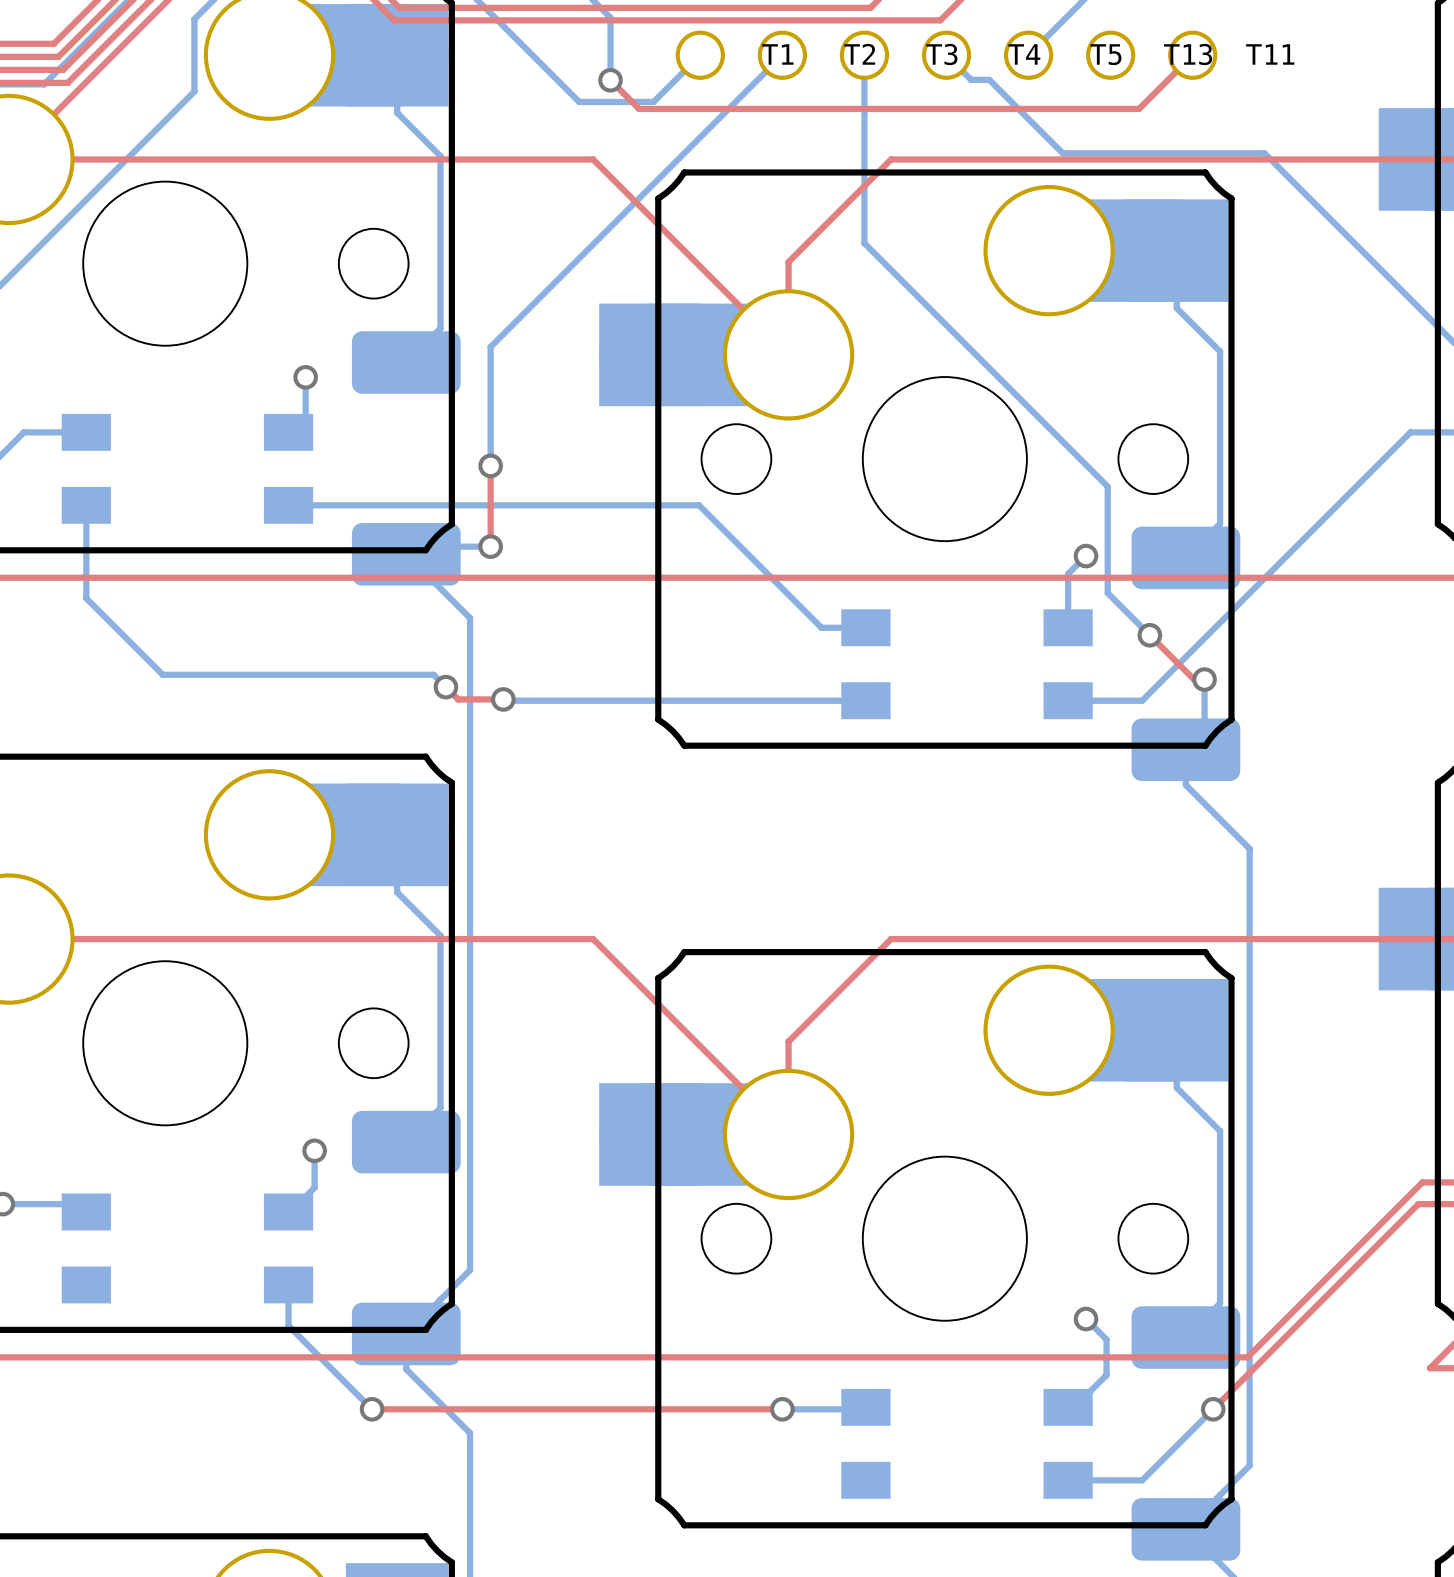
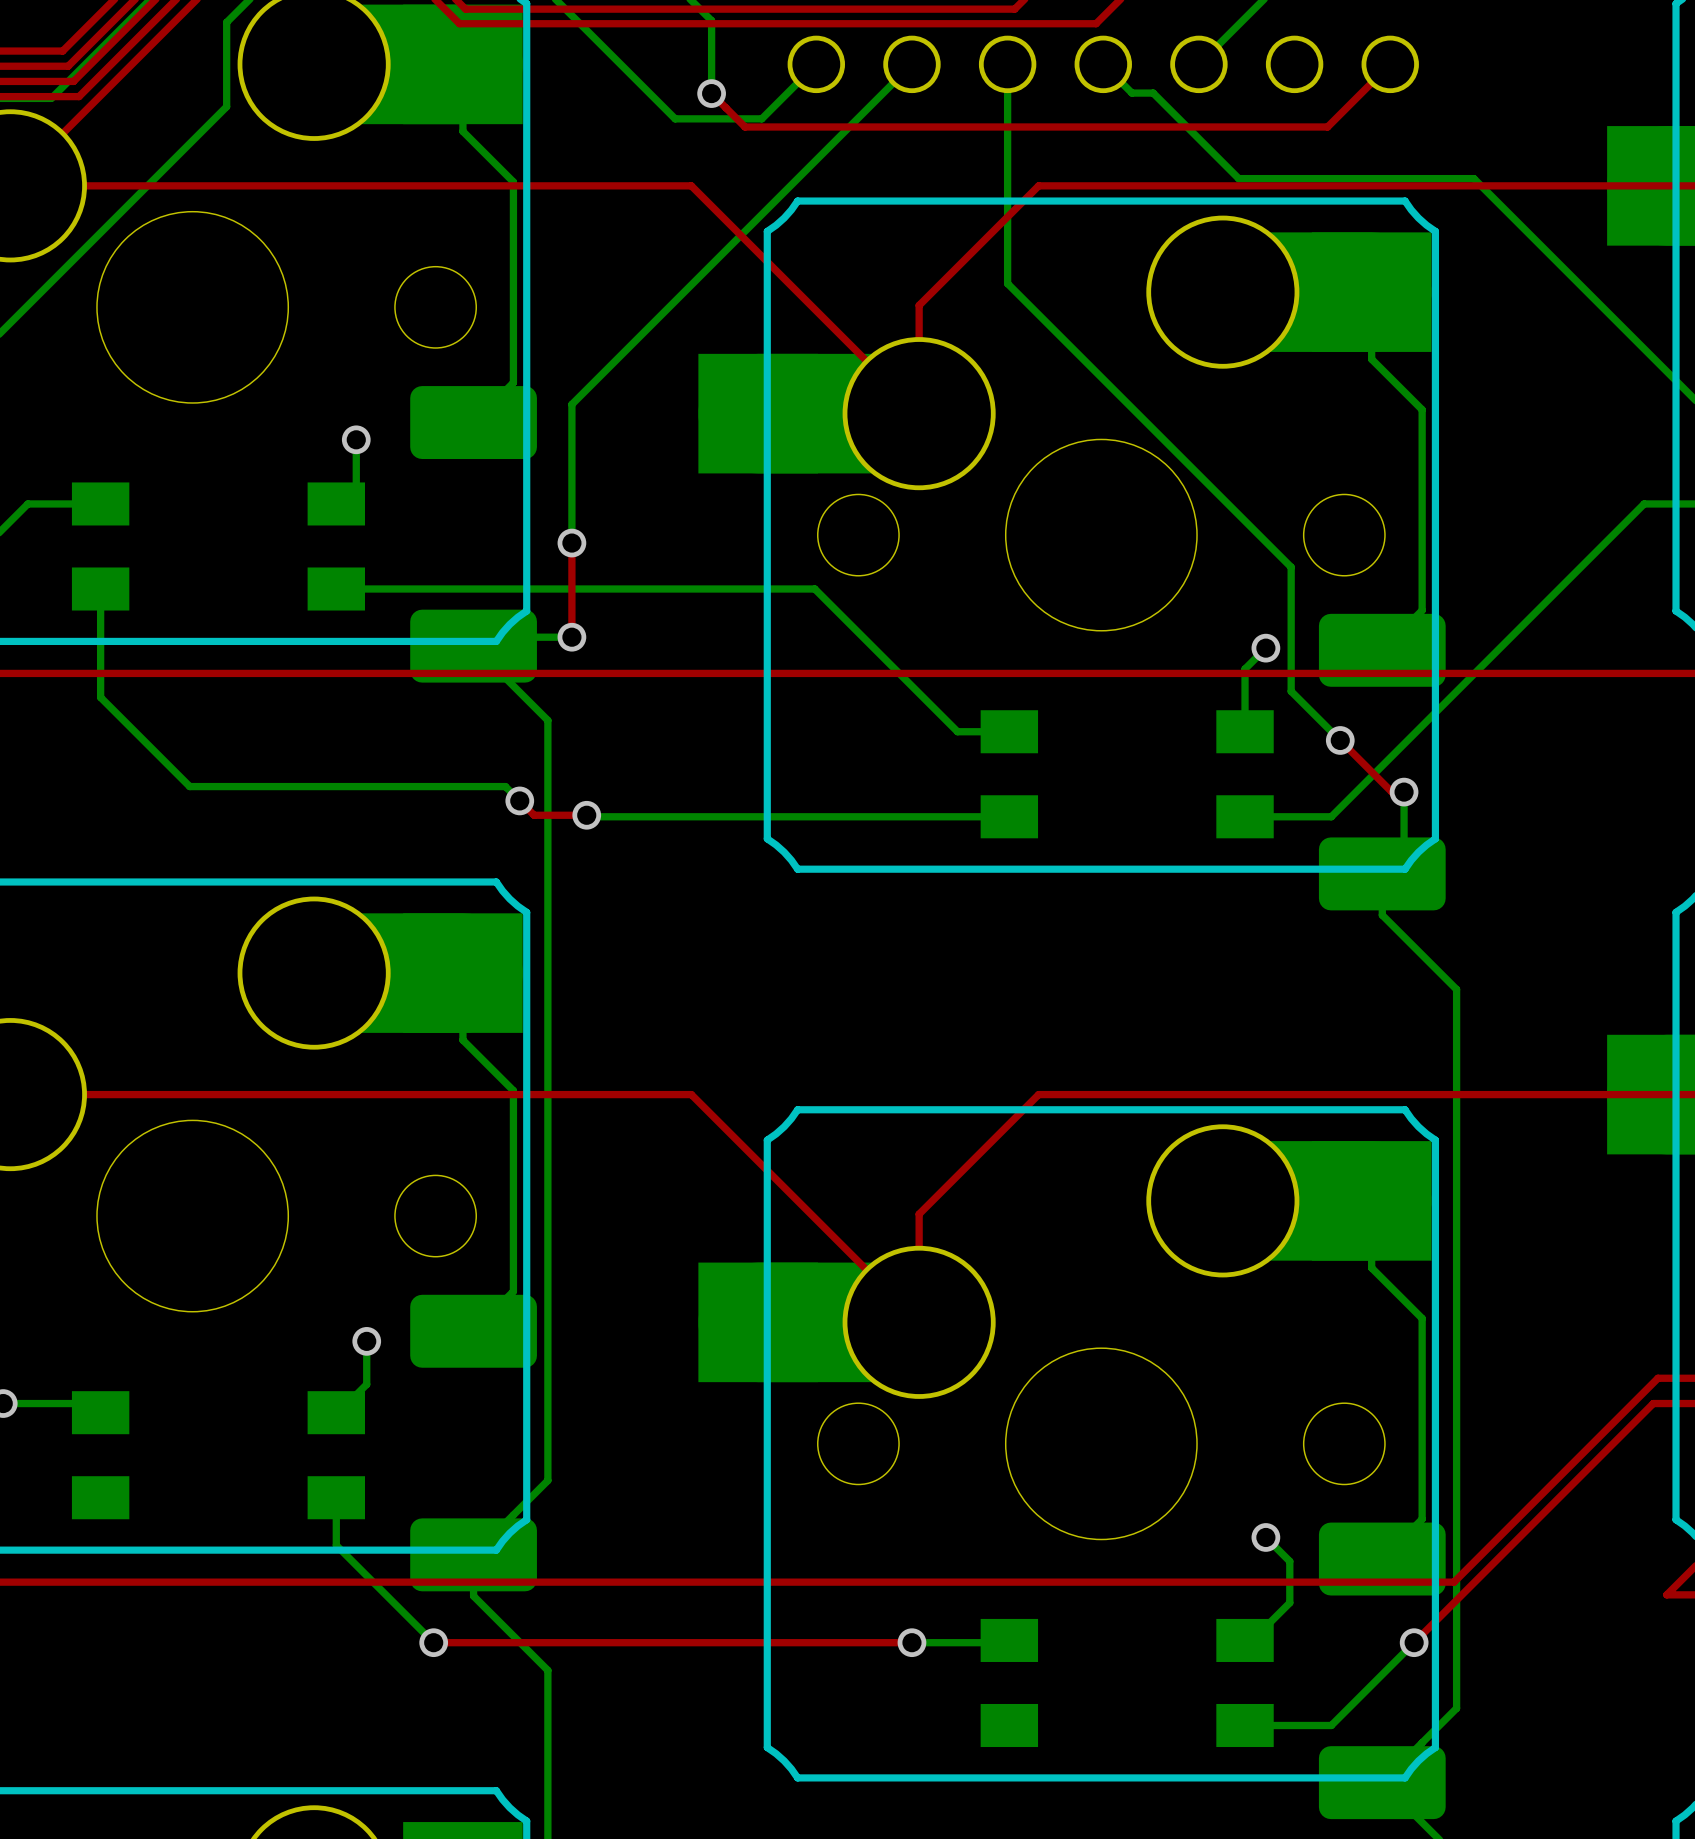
T1 name: T1 (777, 54) -> none
T2 name: T2 (859, 54) -> none
T3 name: T3 (941, 54) -> none
T4 name: T4 (1024, 54) -> none
T5 name: T5 (1105, 54) -> none
T13 name: T13 (1188, 54) -> none
T11 name: T11 (1270, 54) -> none

